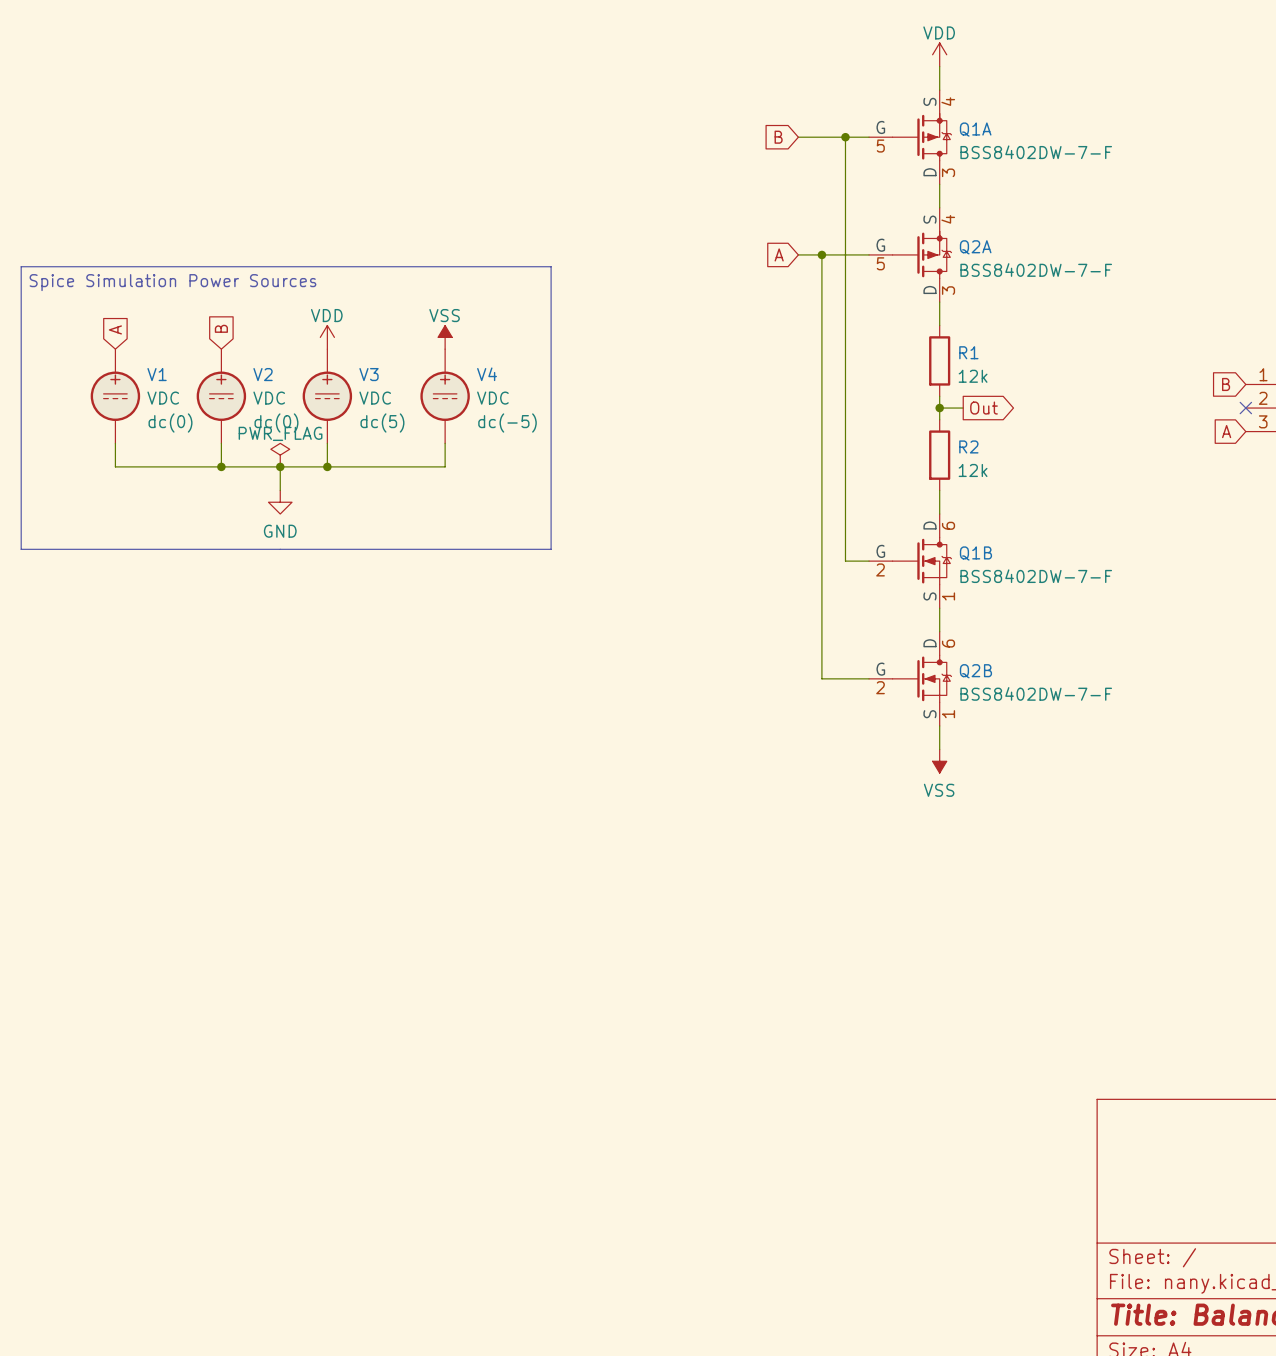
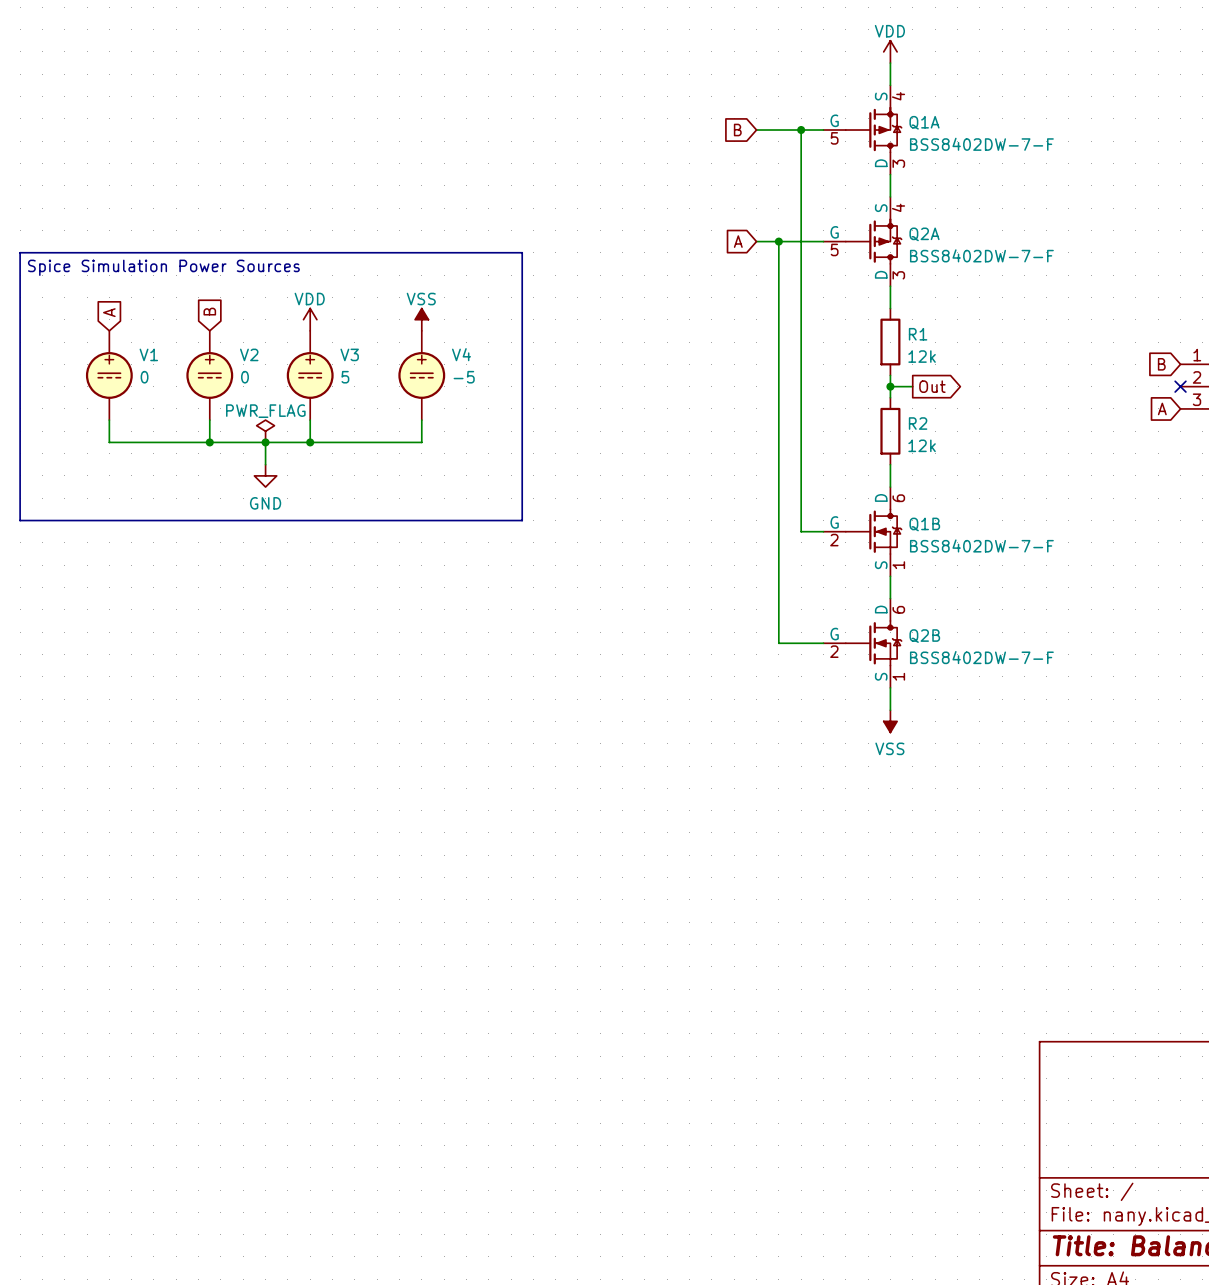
V1 value: VDC (163, 398) -> 0 (144, 377)
V2 value: VDC (269, 398) -> 0 (244, 377)
V3 value: VDC (375, 398) -> 5 (345, 377)
V4 value: VDC (492, 398) -> -5 (464, 377)
V1 text: dc(0) (170, 423) -> none
V2 text: dc(0) (276, 423) -> none
V3 text: dc(5) (382, 423) -> none
V4 text: dc(-5) (507, 423) -> none

